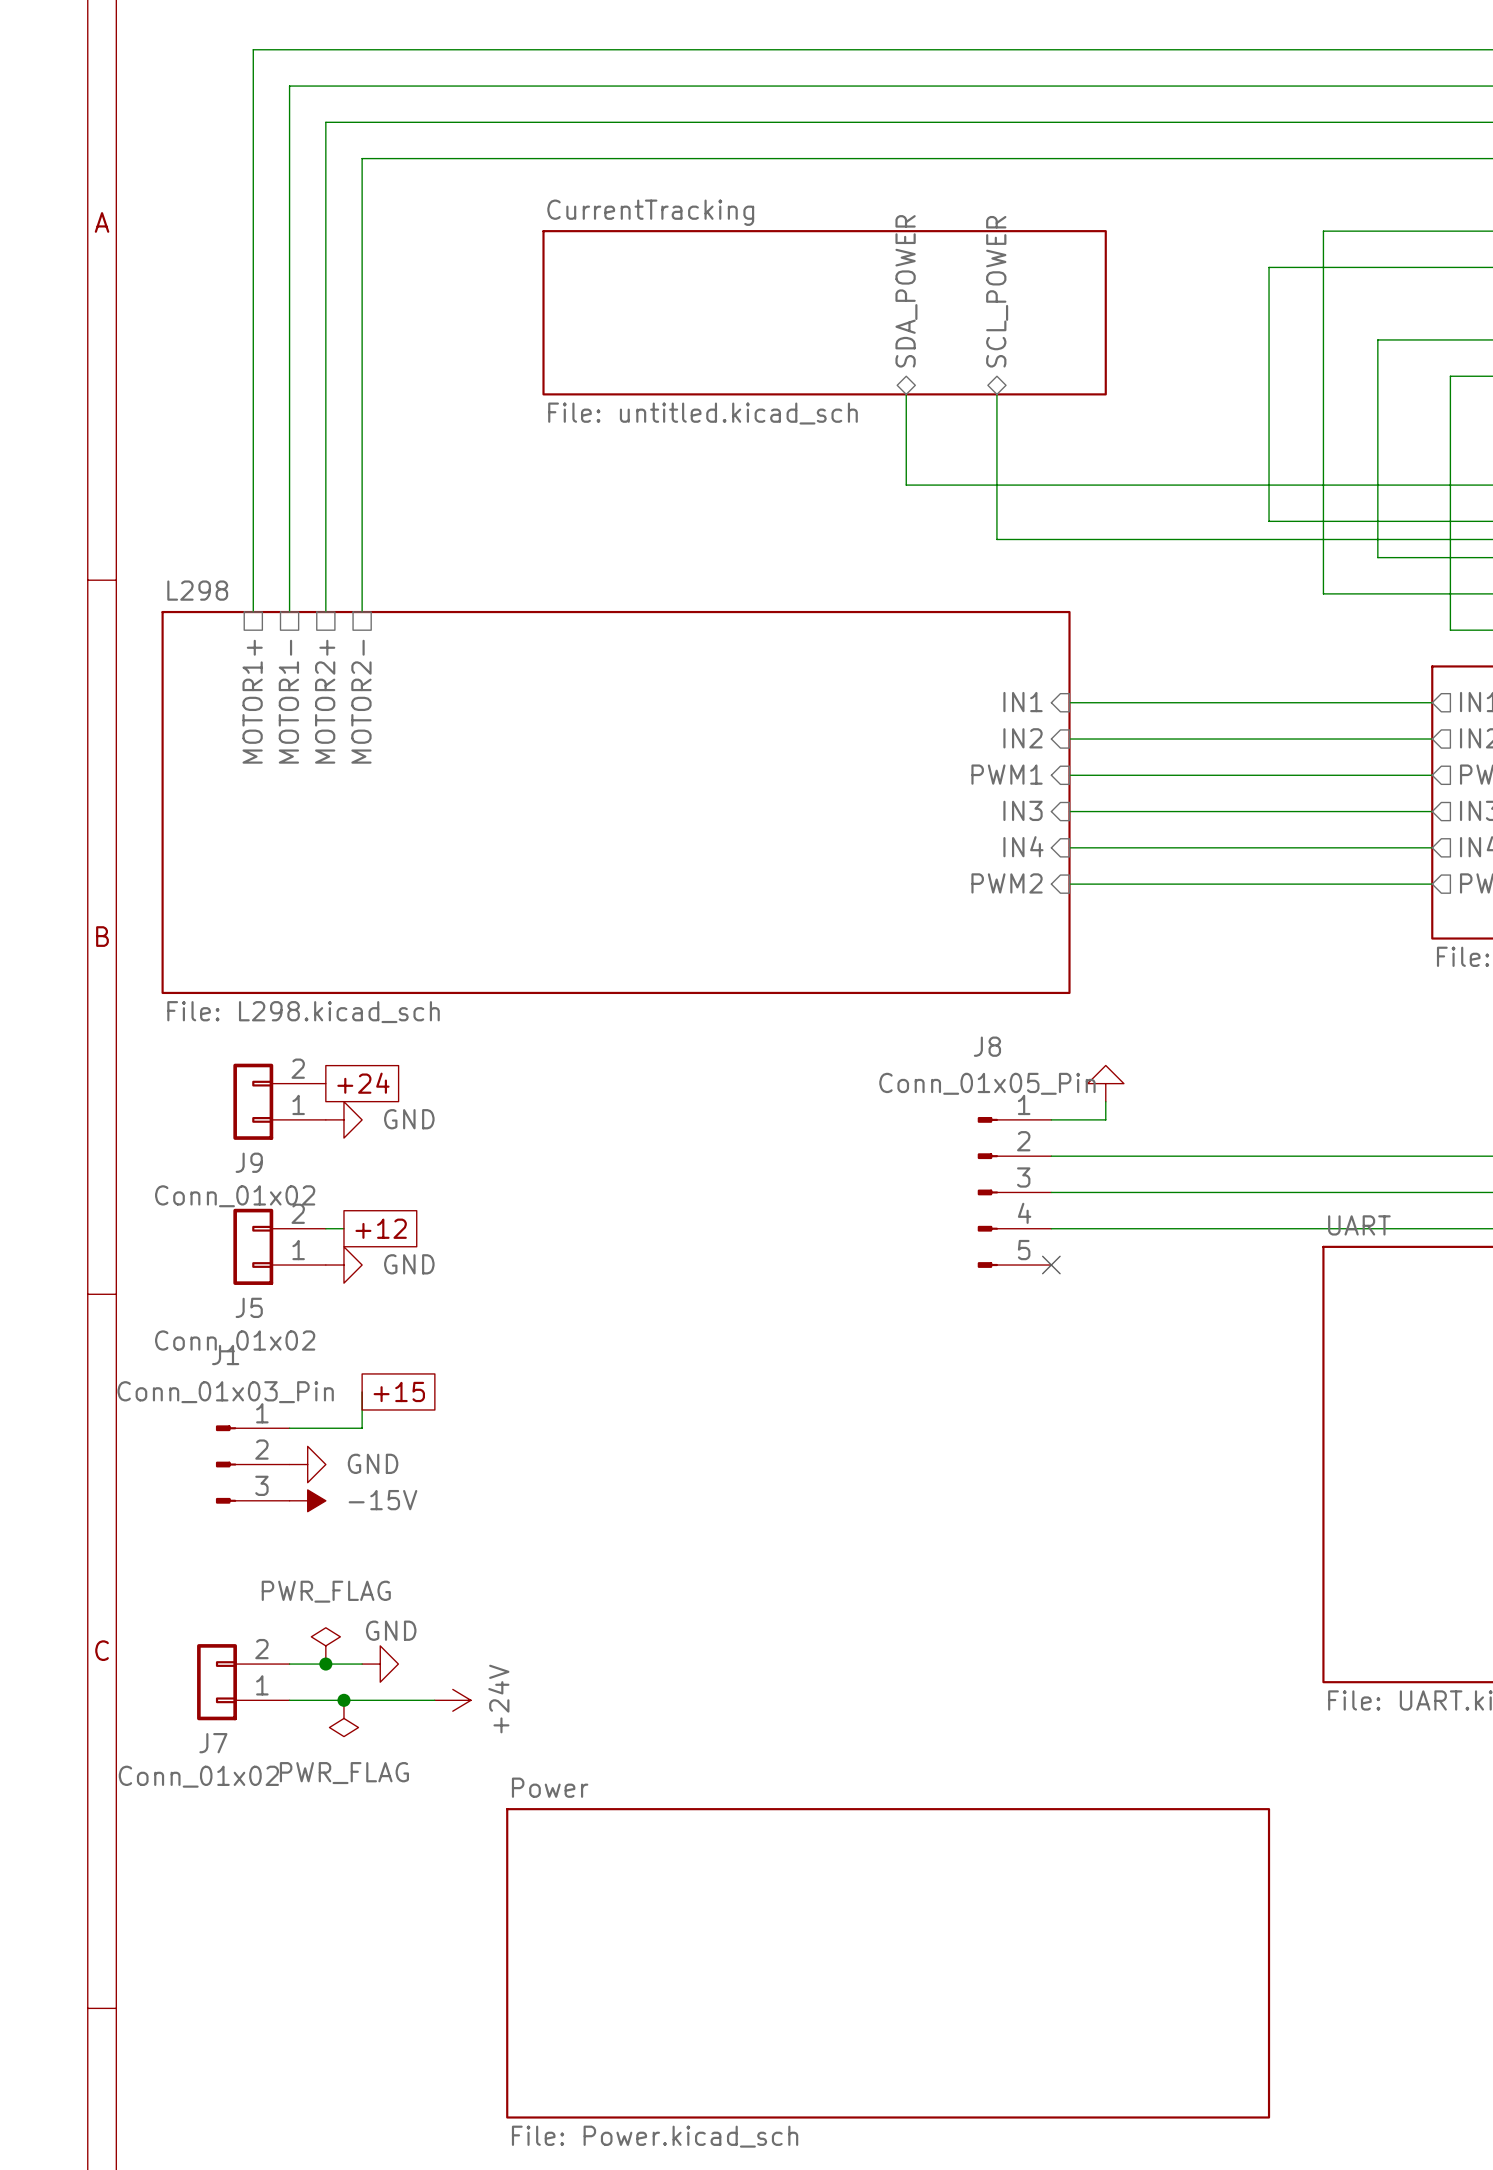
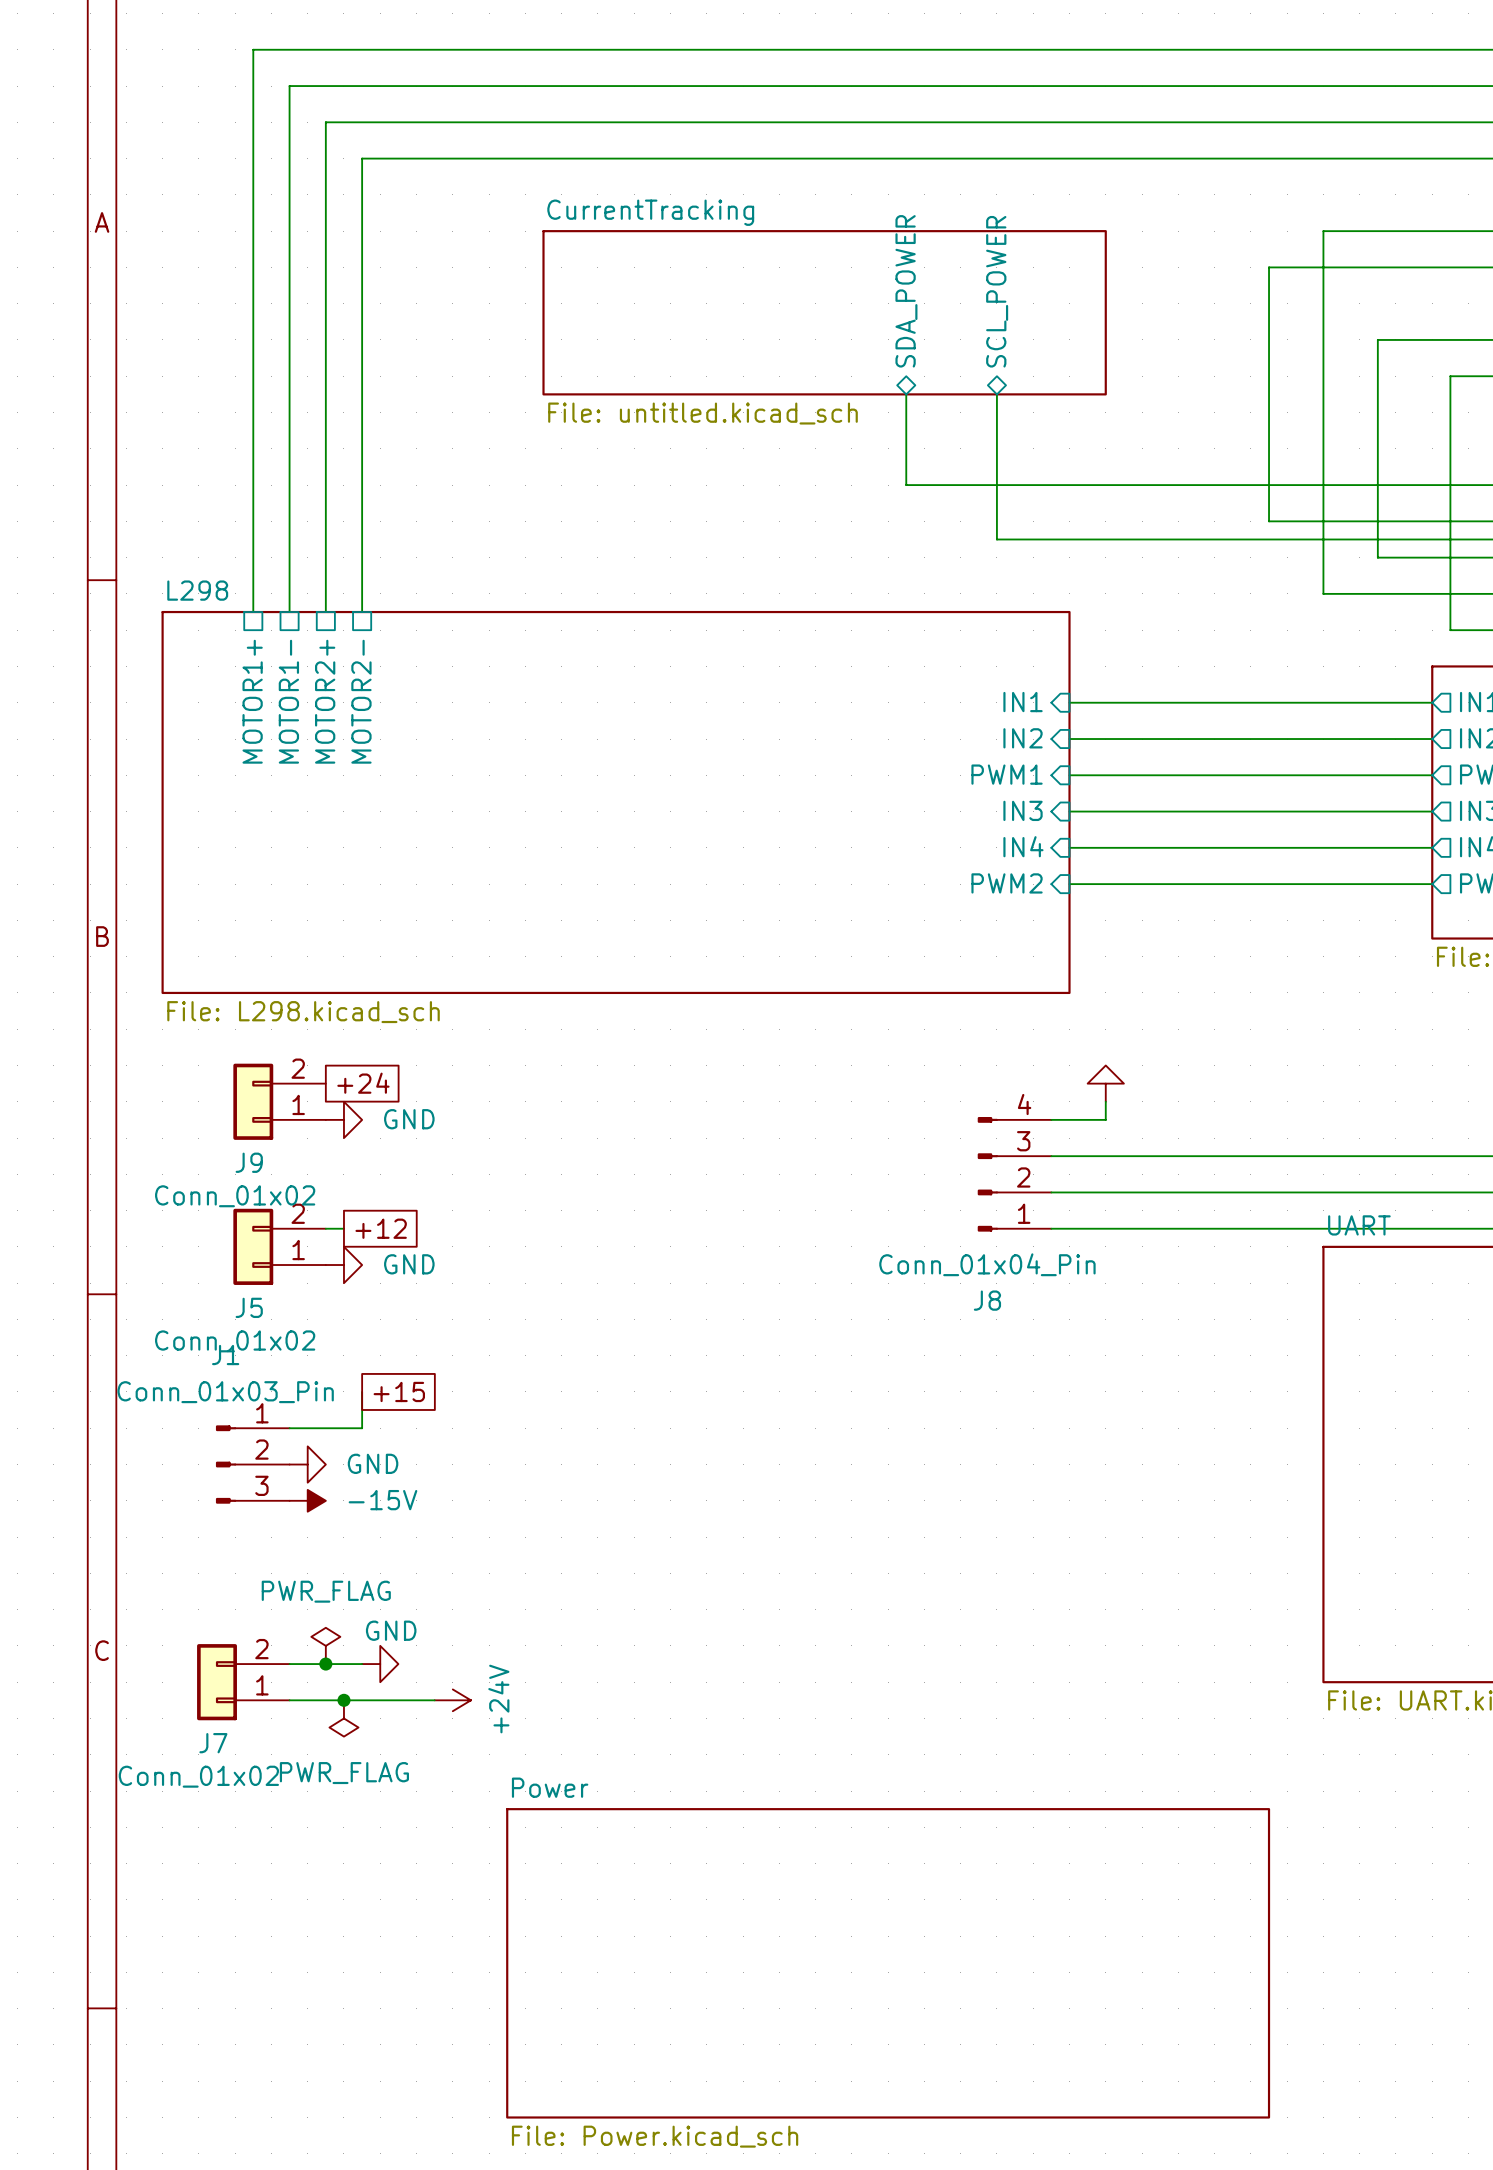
J8 name position: J8 (987, 1046) -> J8 (987, 1300)
J8 value: Conn_01x05_Pin (987, 1083) -> Conn_01x04_Pin (987, 1264)
J8 symbol: [977, 1117, 1052, 1268] -> [977, 1117, 1052, 1232]
no-connect mark: (1051, 1265) -> none

